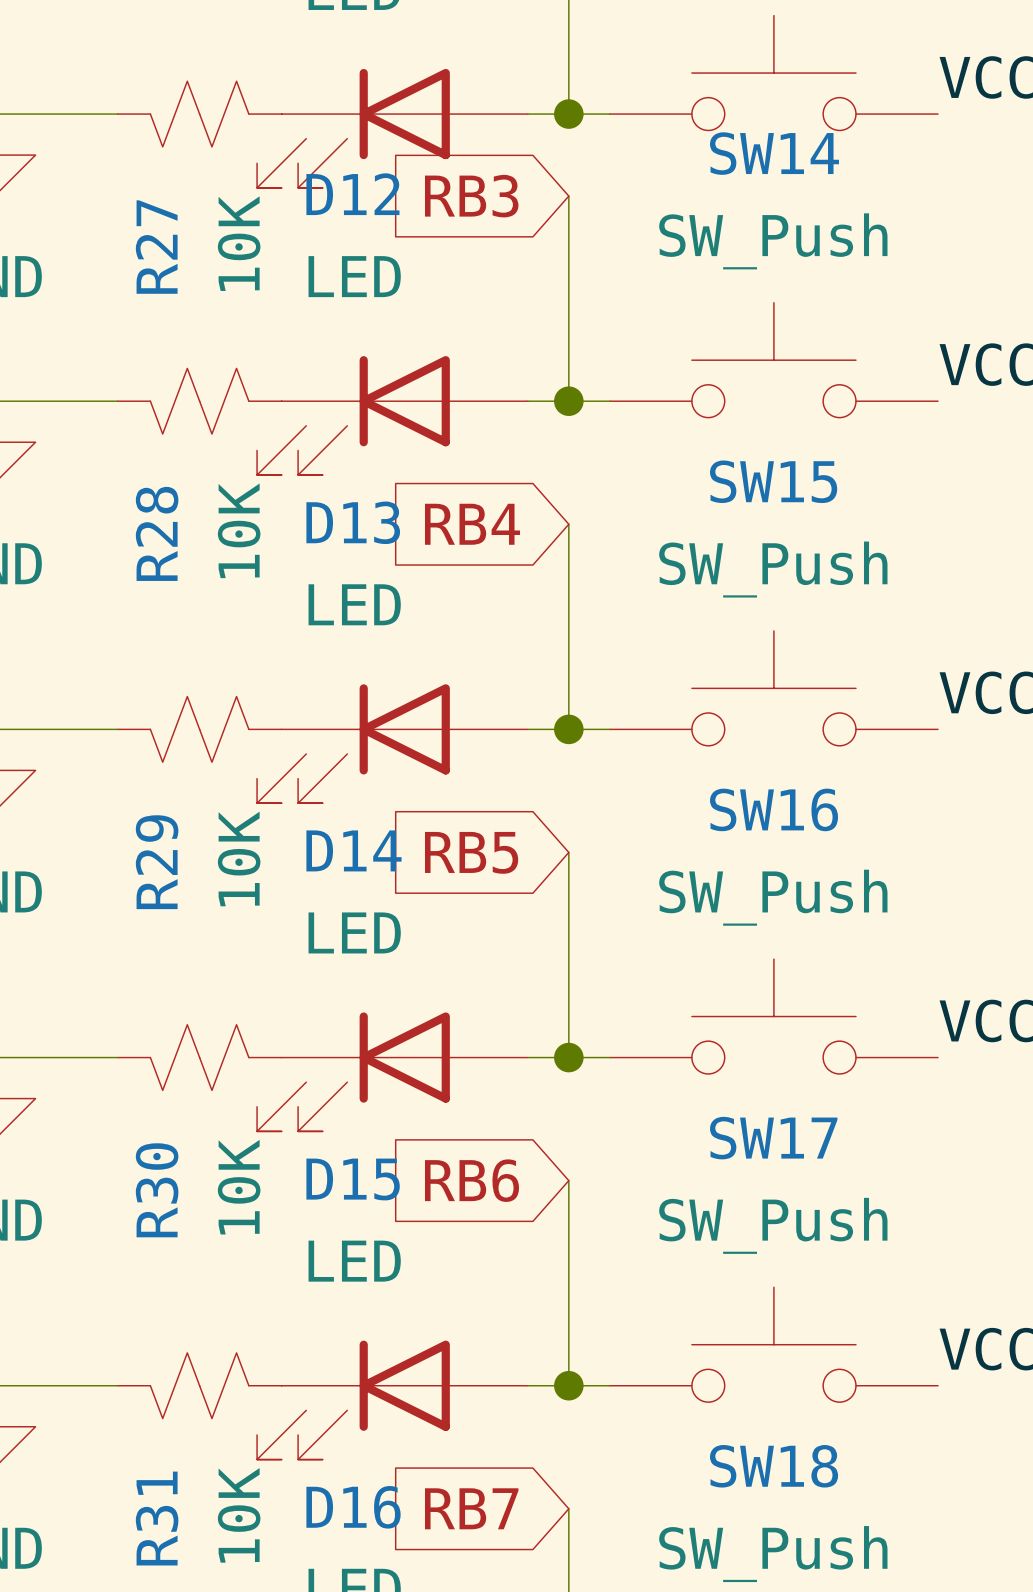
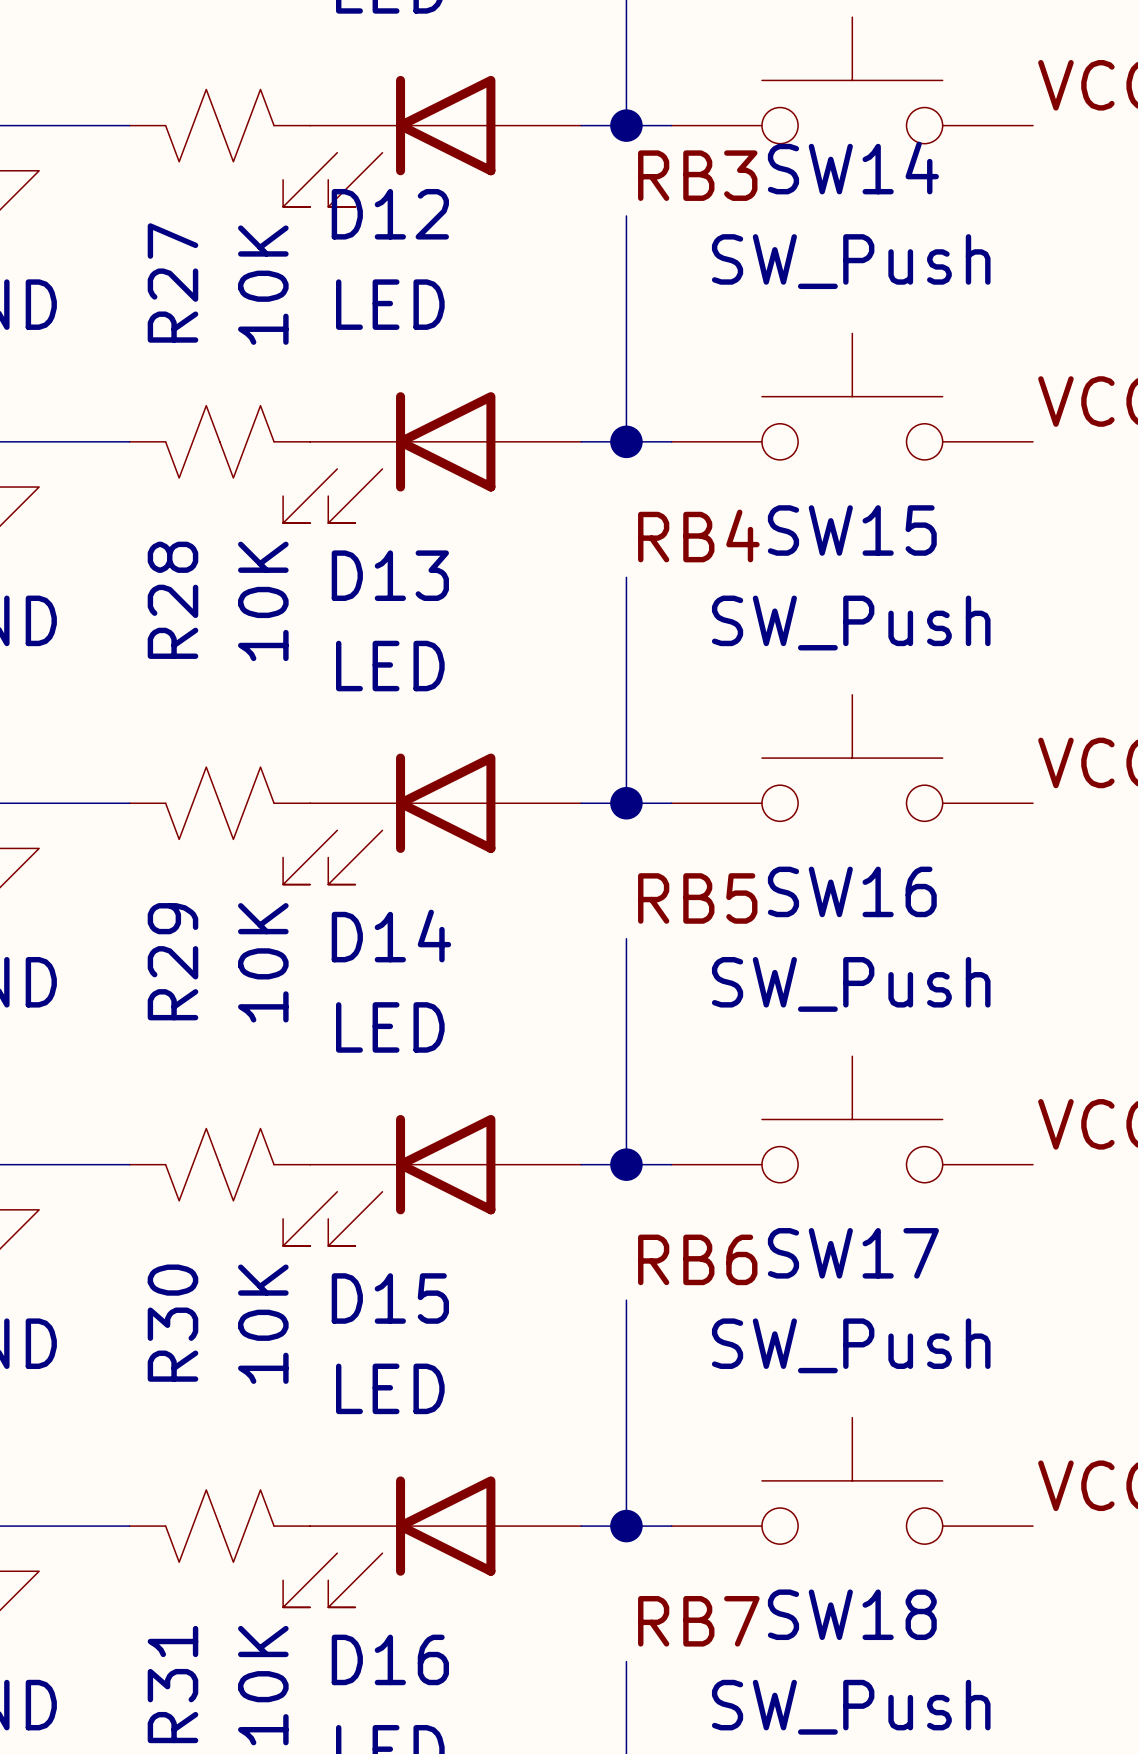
label: none -> RB3 (697, 175)
global label: RB3 (471, 196) -> none
label: none -> RB4 (698, 535)
global label: RB4 (472, 524) -> none
label: none -> RB5 (697, 898)
global label: RB5 (471, 852) -> none
label: none -> RB6 (697, 1259)
global label: RB6 (472, 1180) -> none
label: none -> RB7 (698, 1621)
global label: RB7 (471, 1508) -> none

